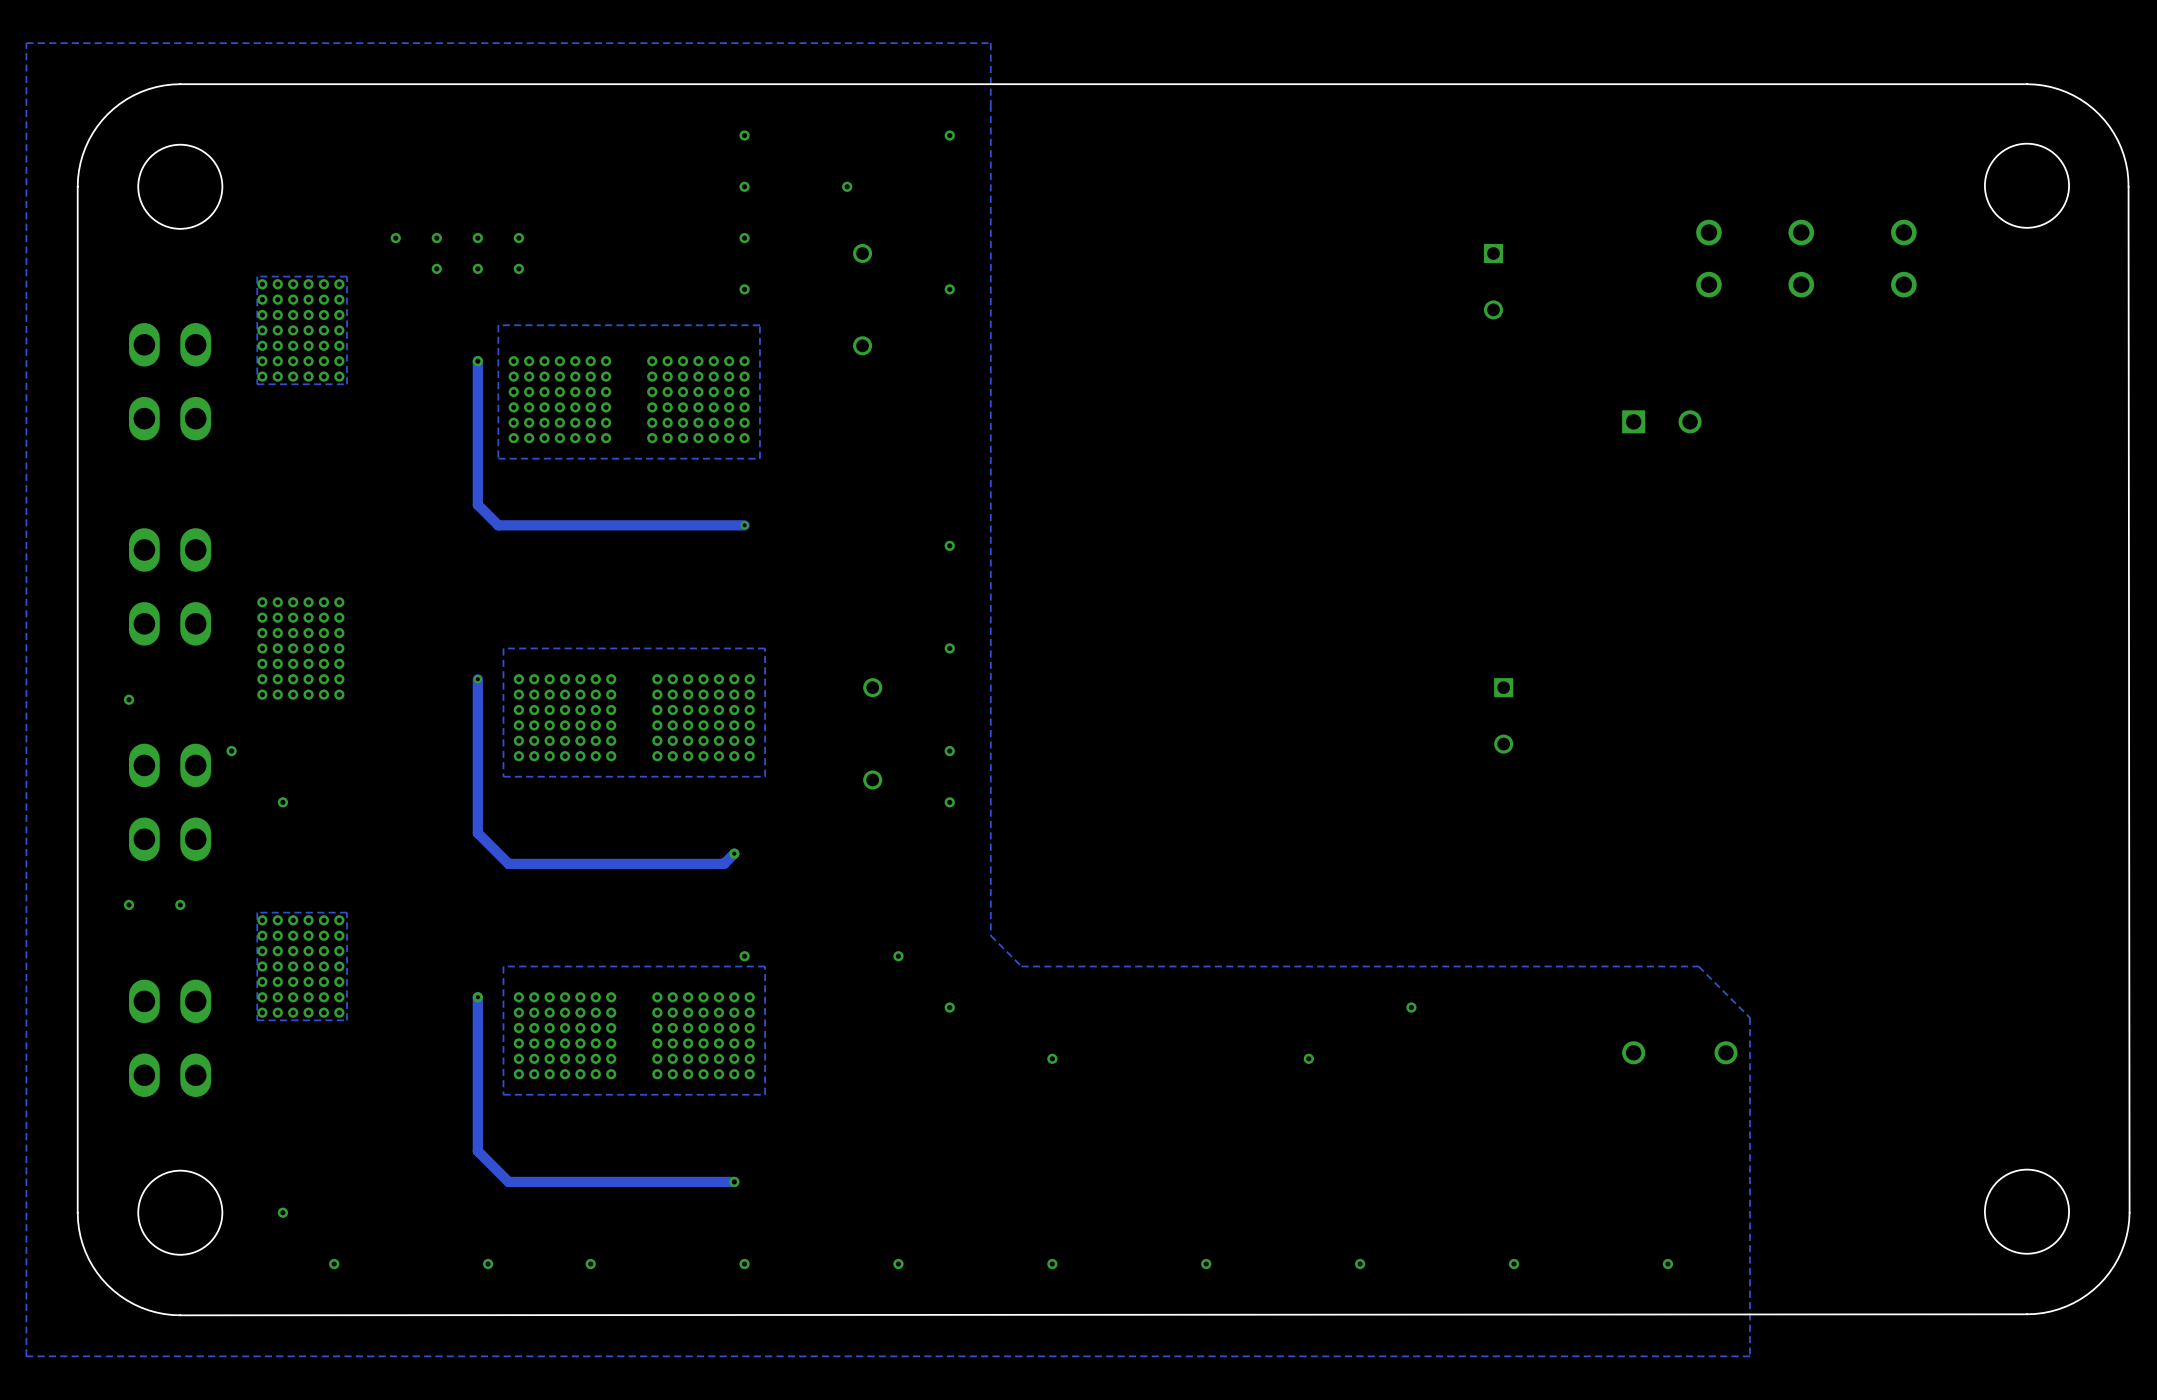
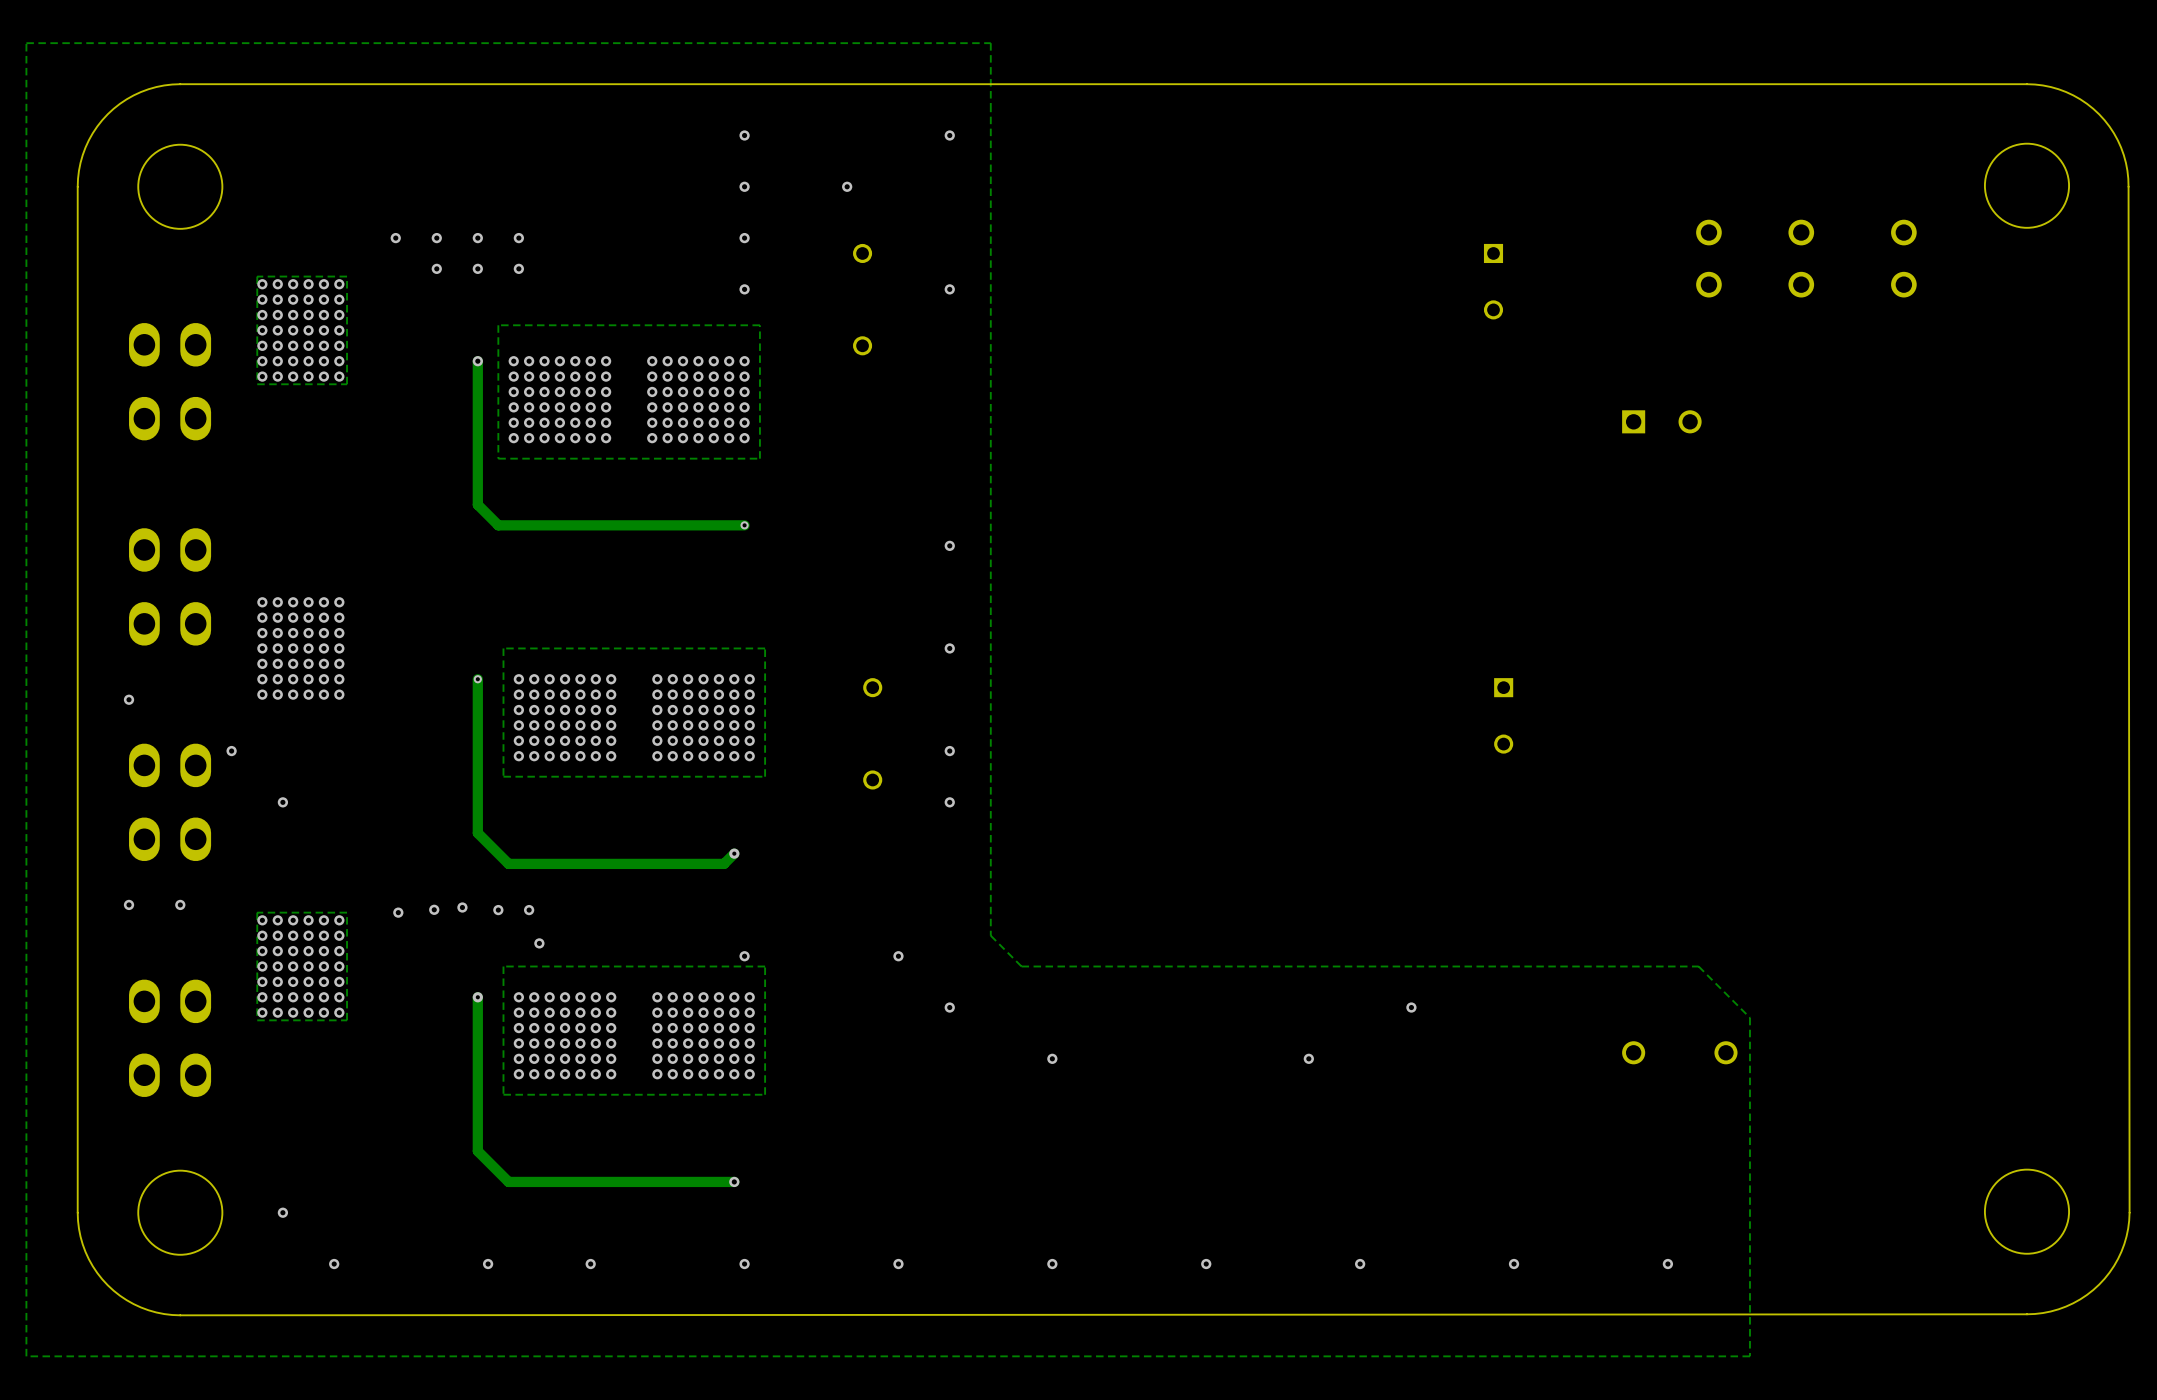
via: none -> (462, 907)
via: none -> (434, 909)
via: none -> (498, 910)
via: none -> (529, 910)
via: none -> (398, 912)
via: none -> (539, 943)

